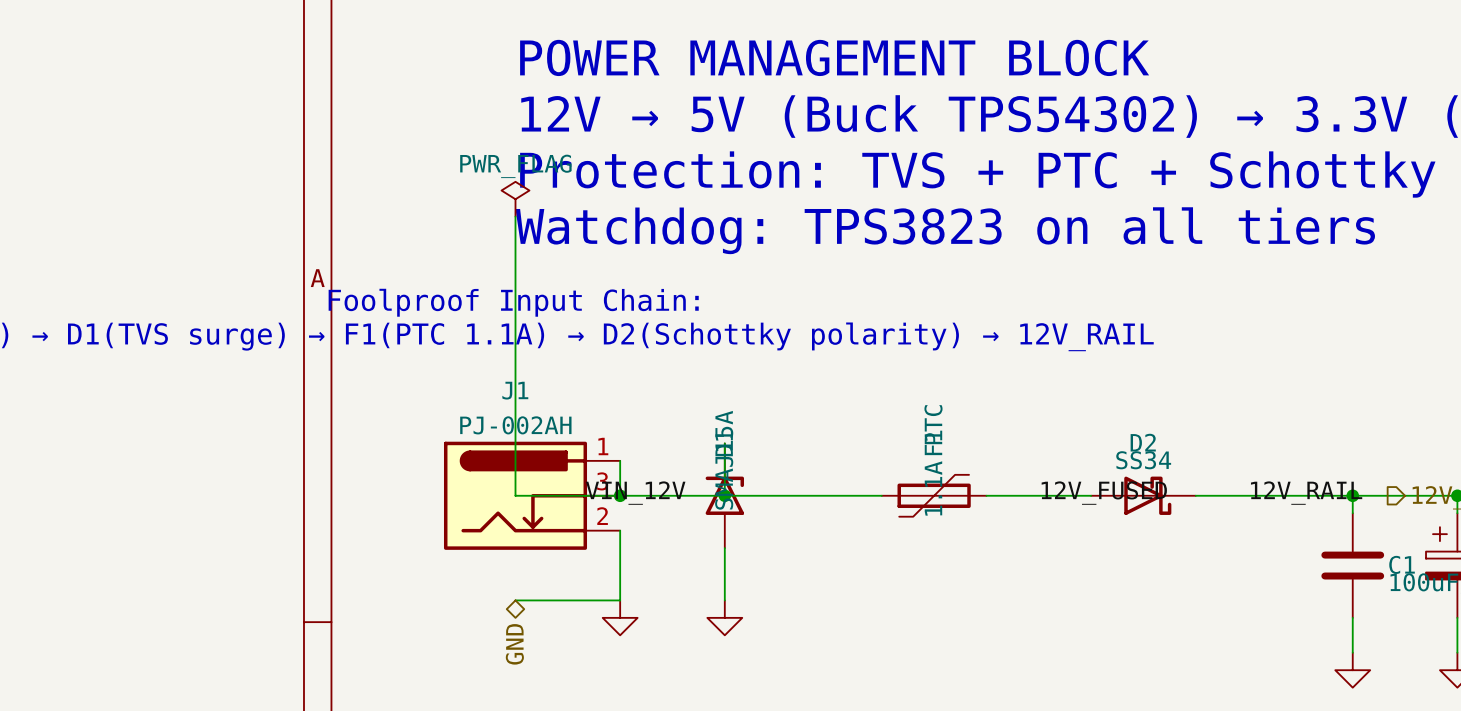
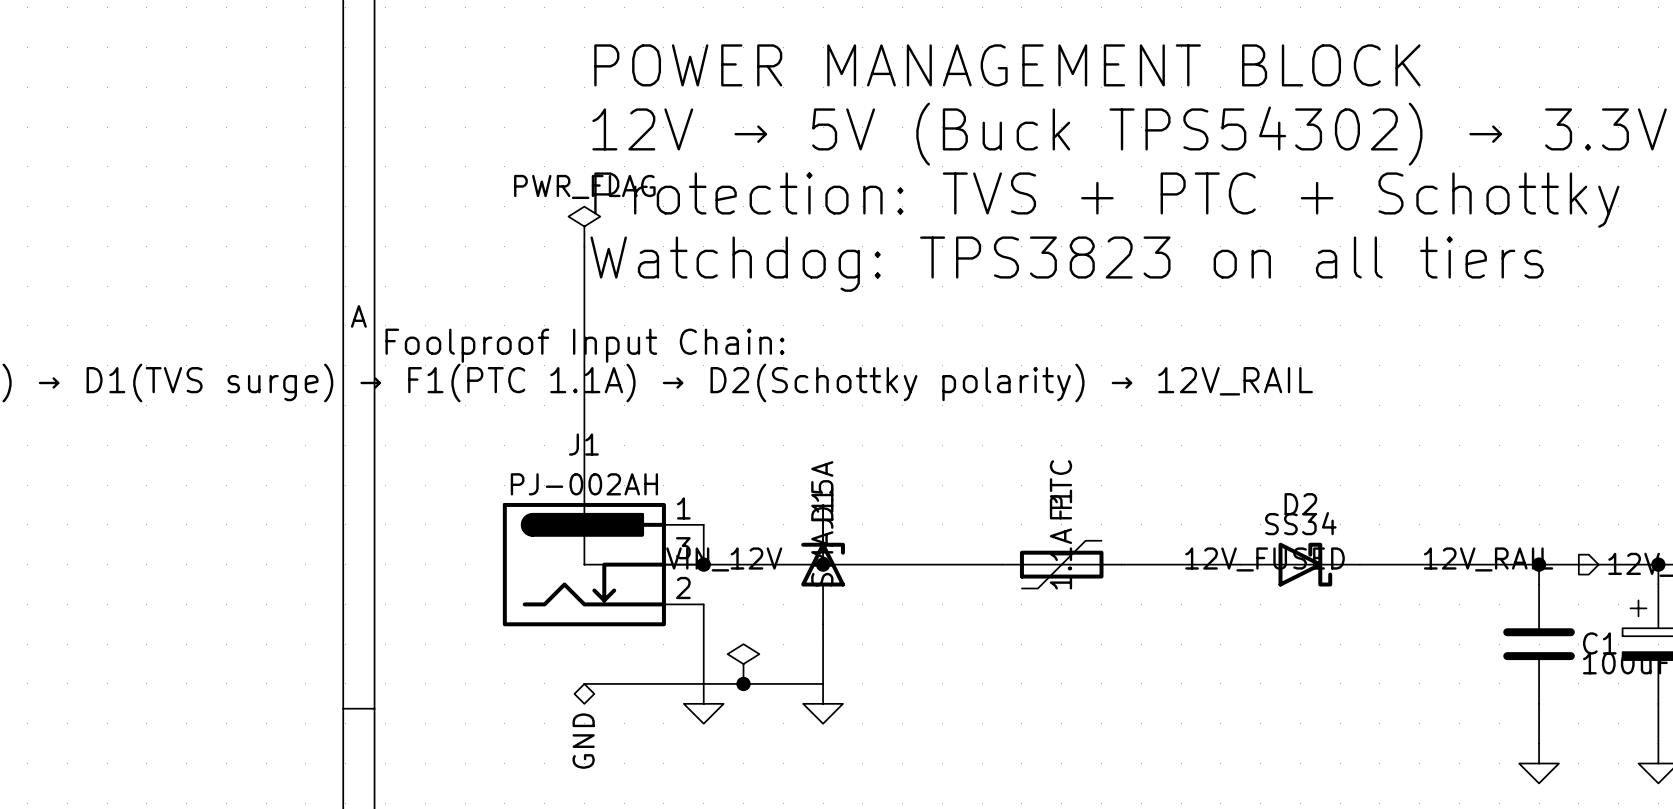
power symbol: none -> (743, 664)
wire: none -> (703, 683) (823, 683)
junction: none -> (743, 683)

